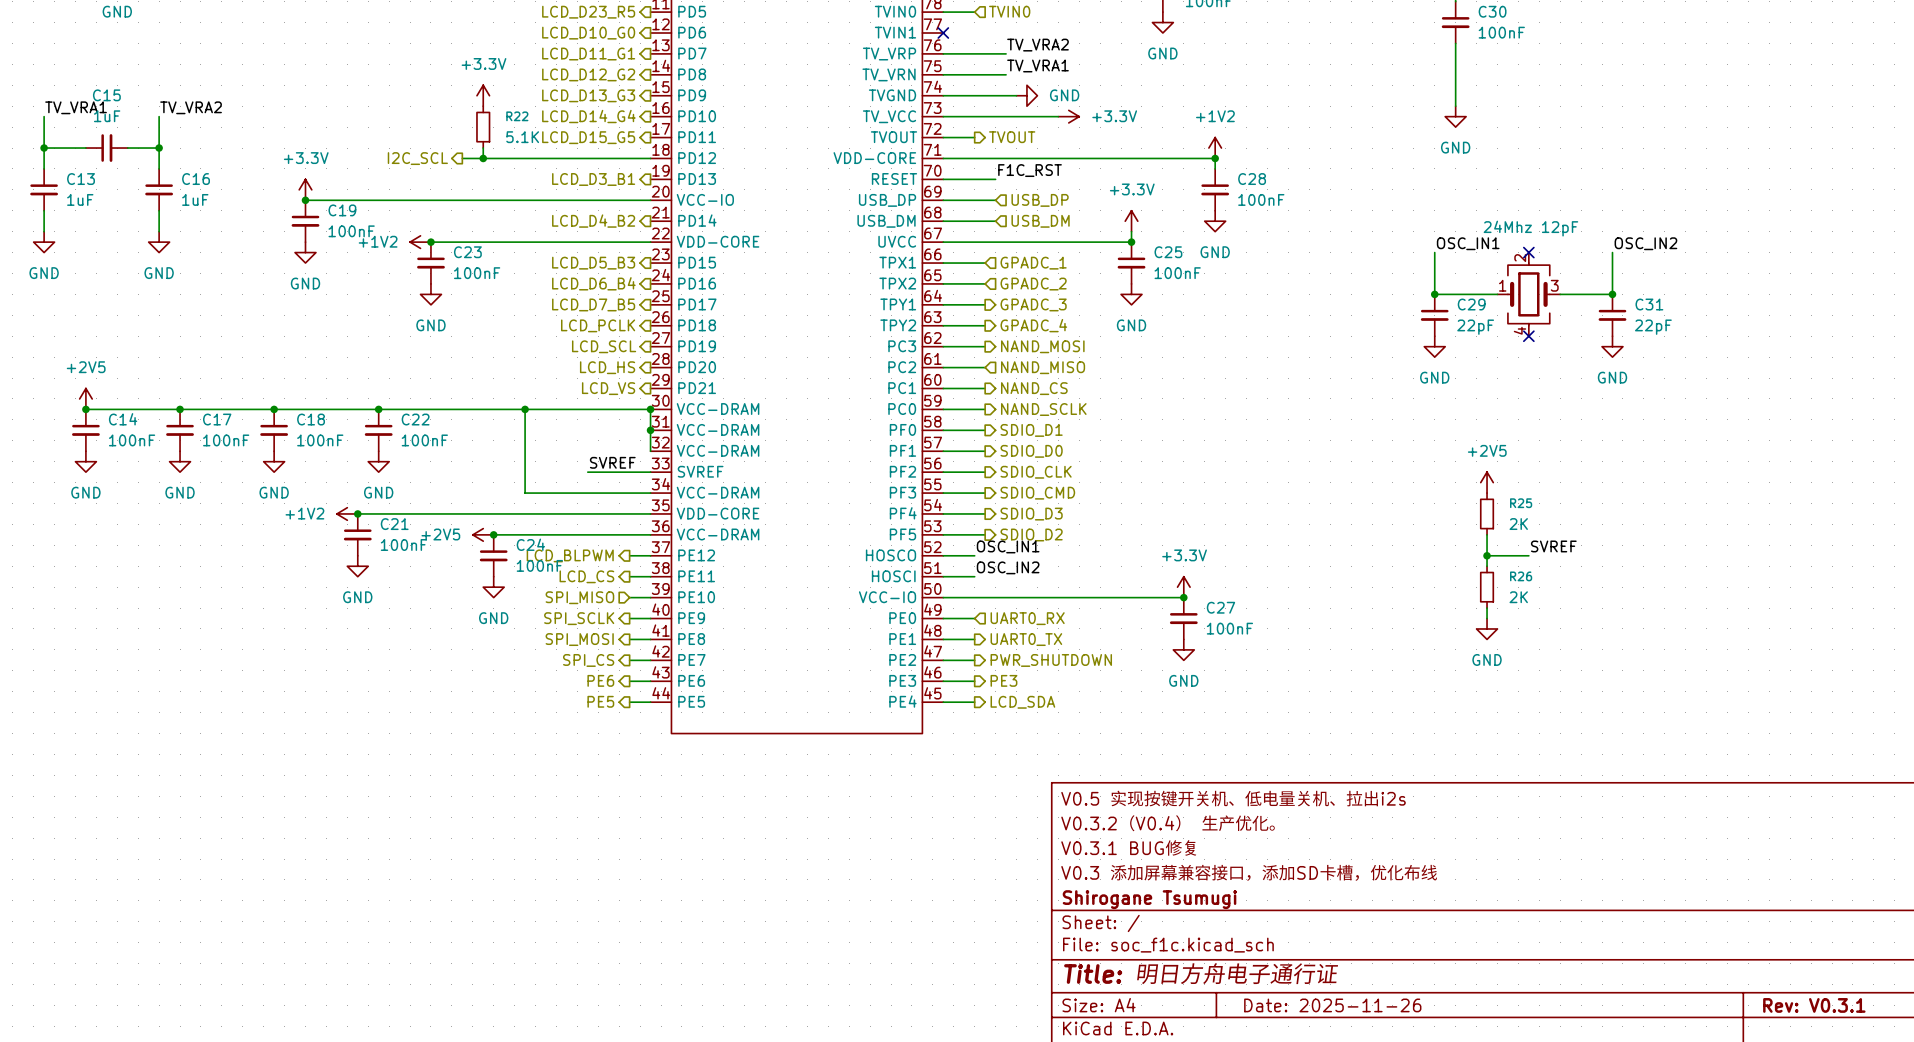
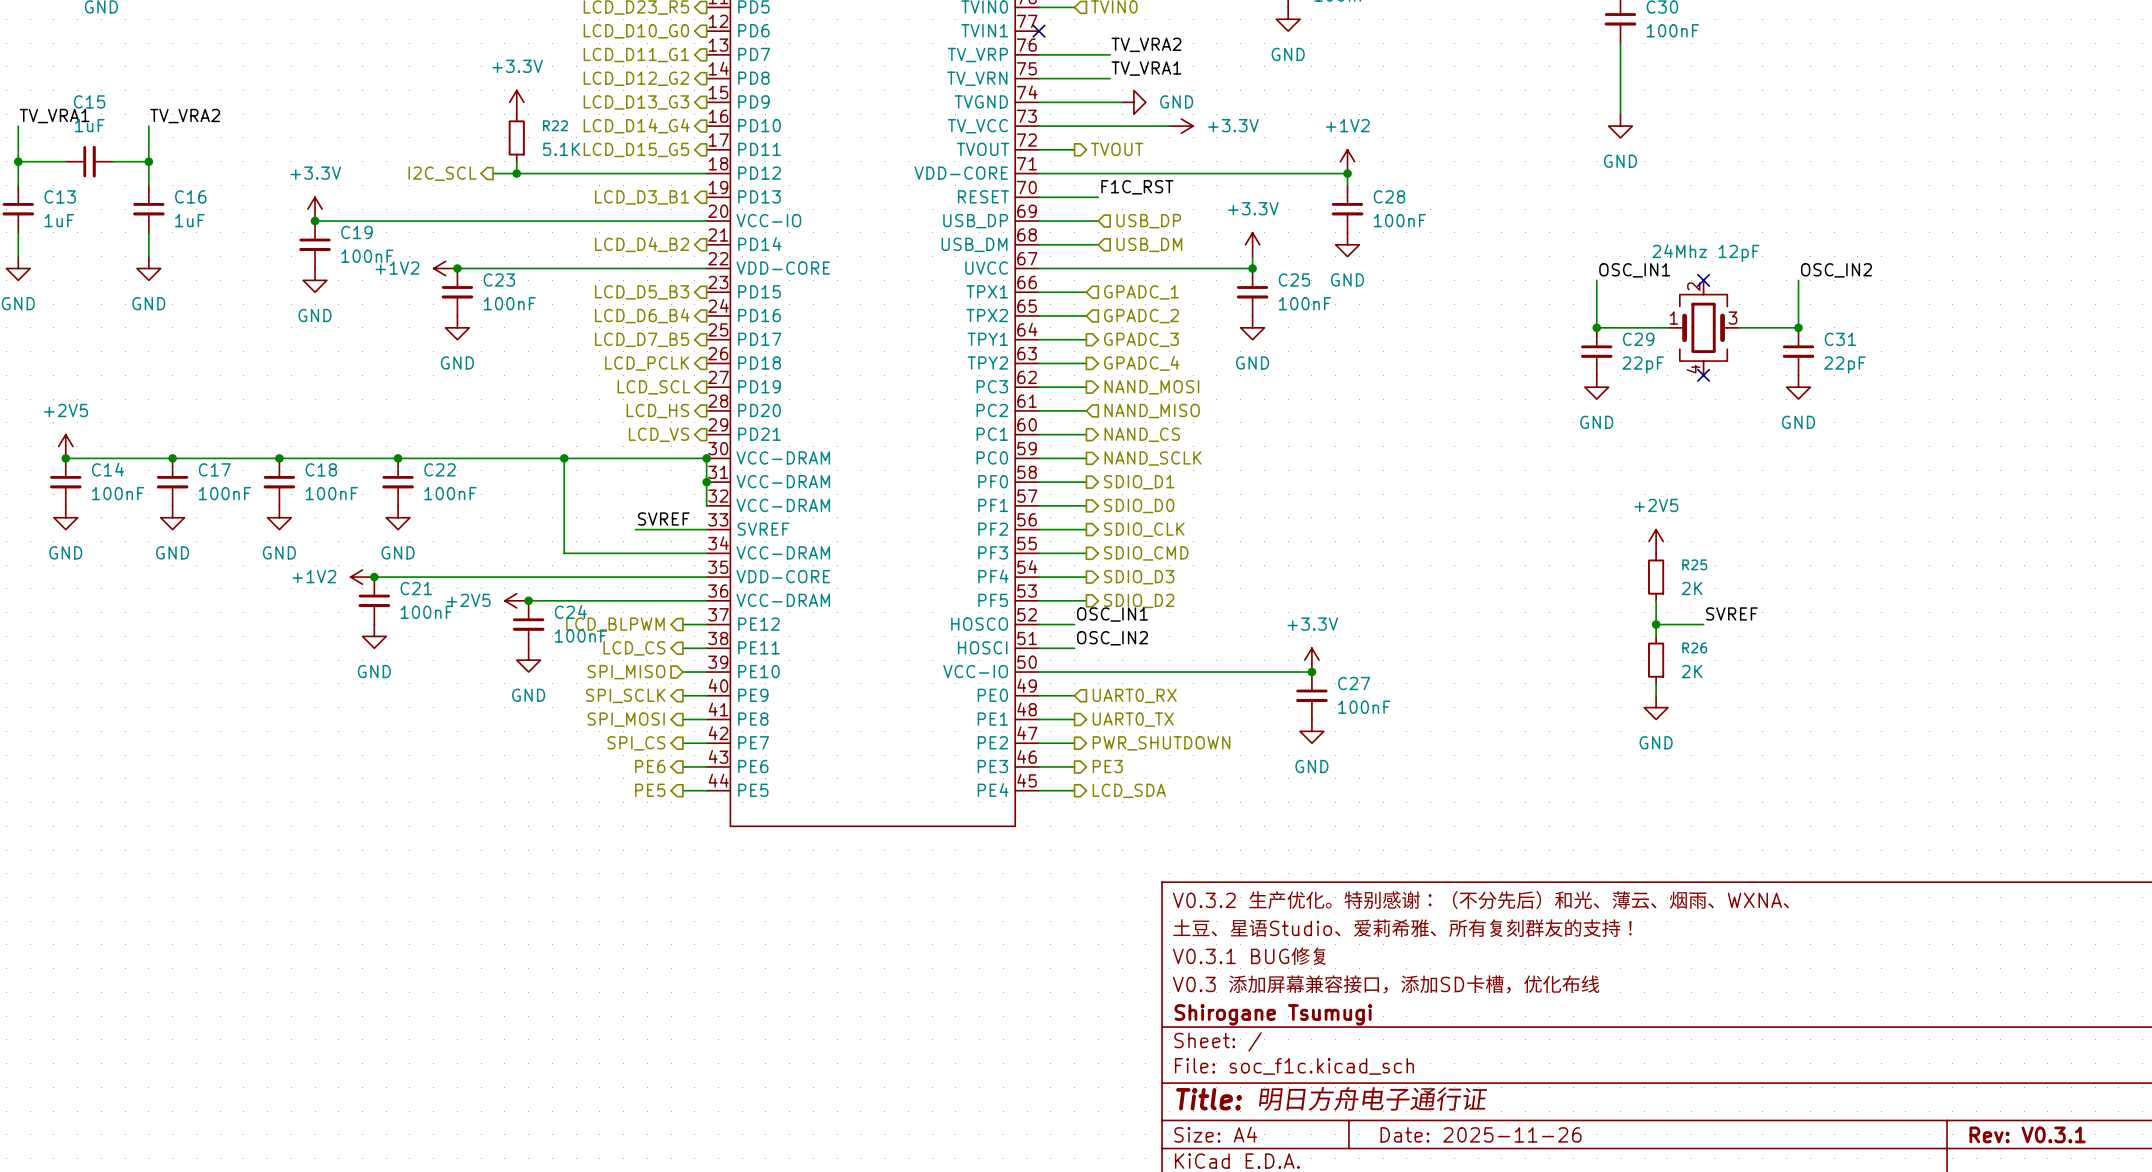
title block: V0.5 实现按键开关机、低电量关机、拉出i2s (1233, 798) -> V0.3.2 生产优化。特别感谢：（不分先后）和光、薄云、烟雨、WXNA、 (1481, 900)
title block: V0.3.2（V0.4） 生产优化。 (1168, 823) -> 土豆、星语Studio、爱莉希雅、所有复刻群友的支持！ (1402, 928)

